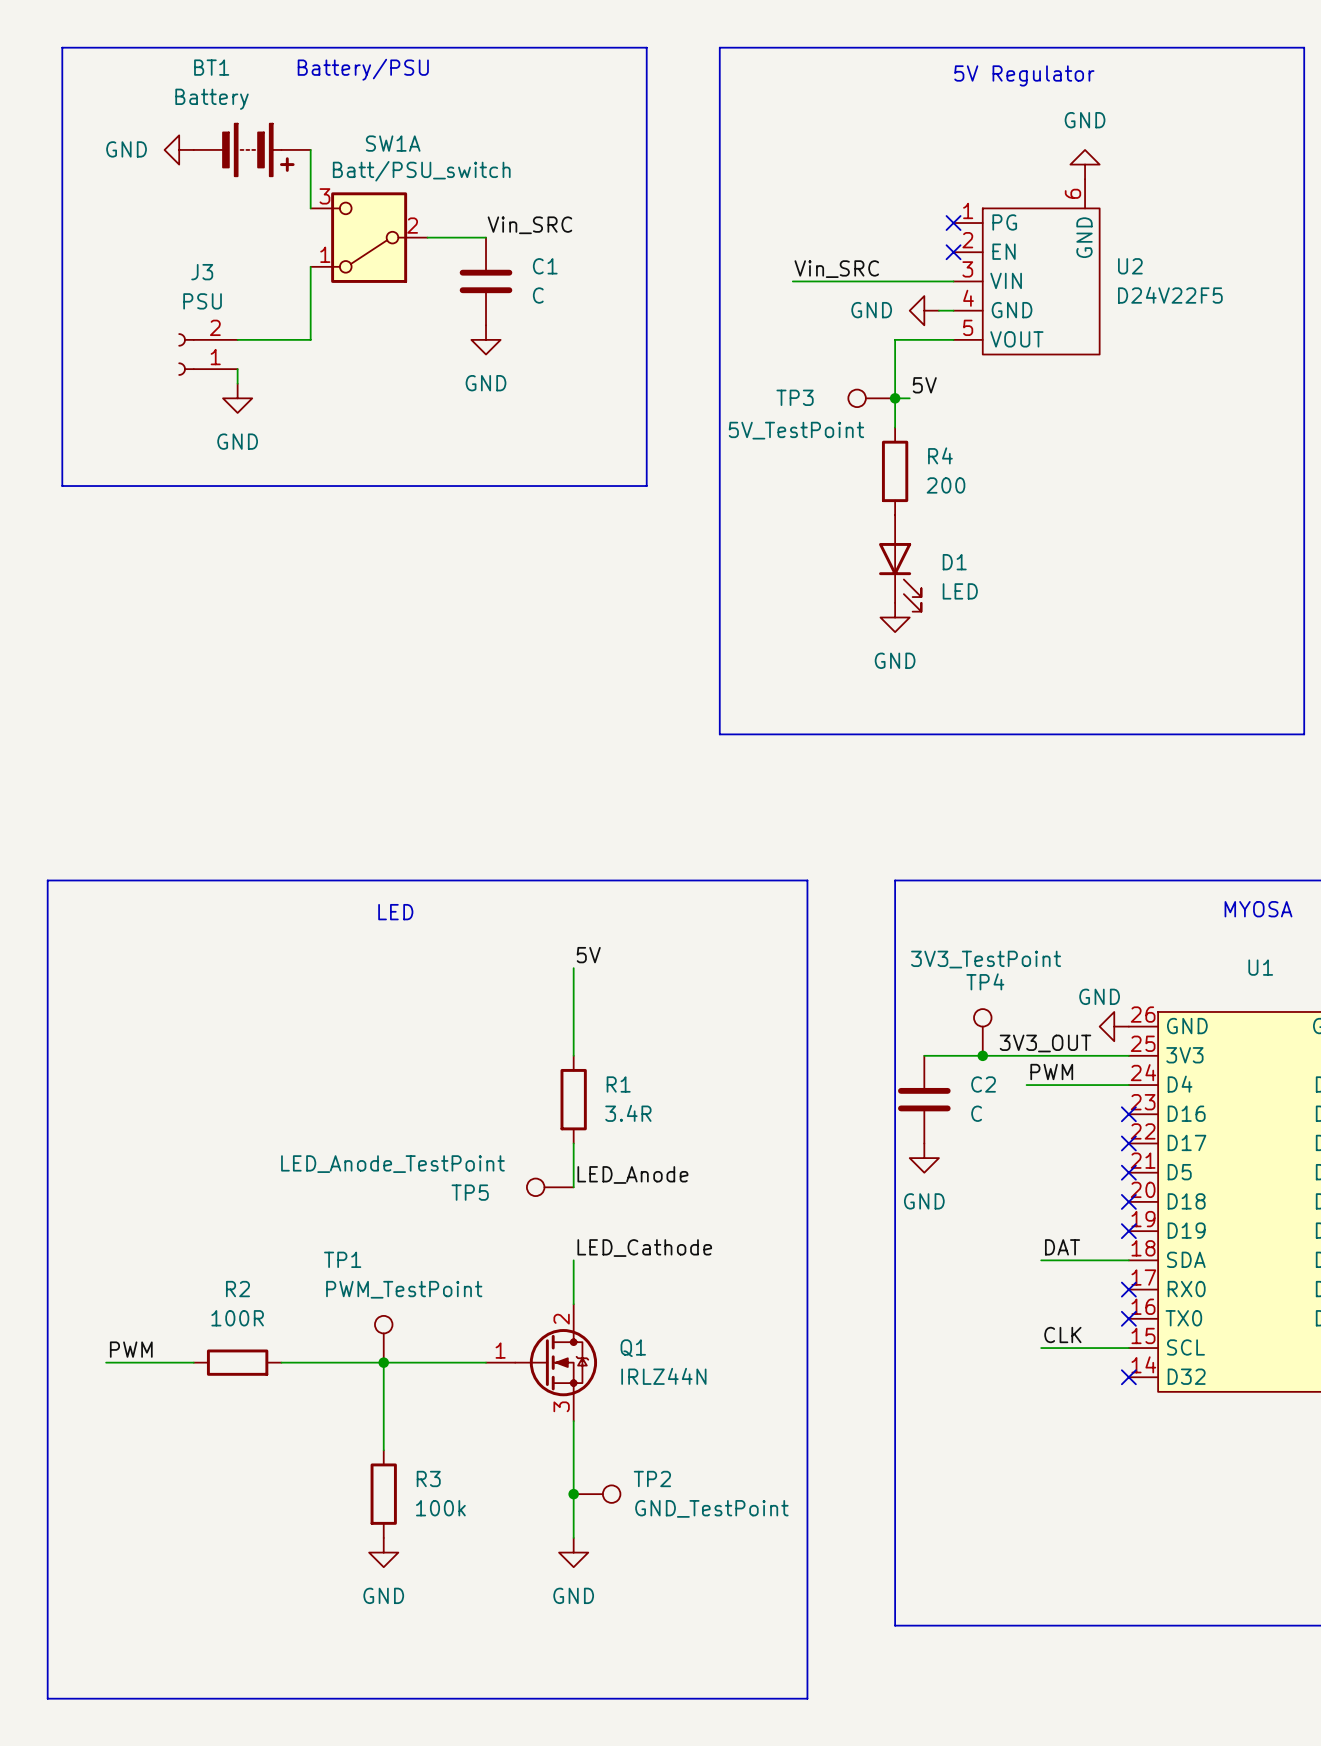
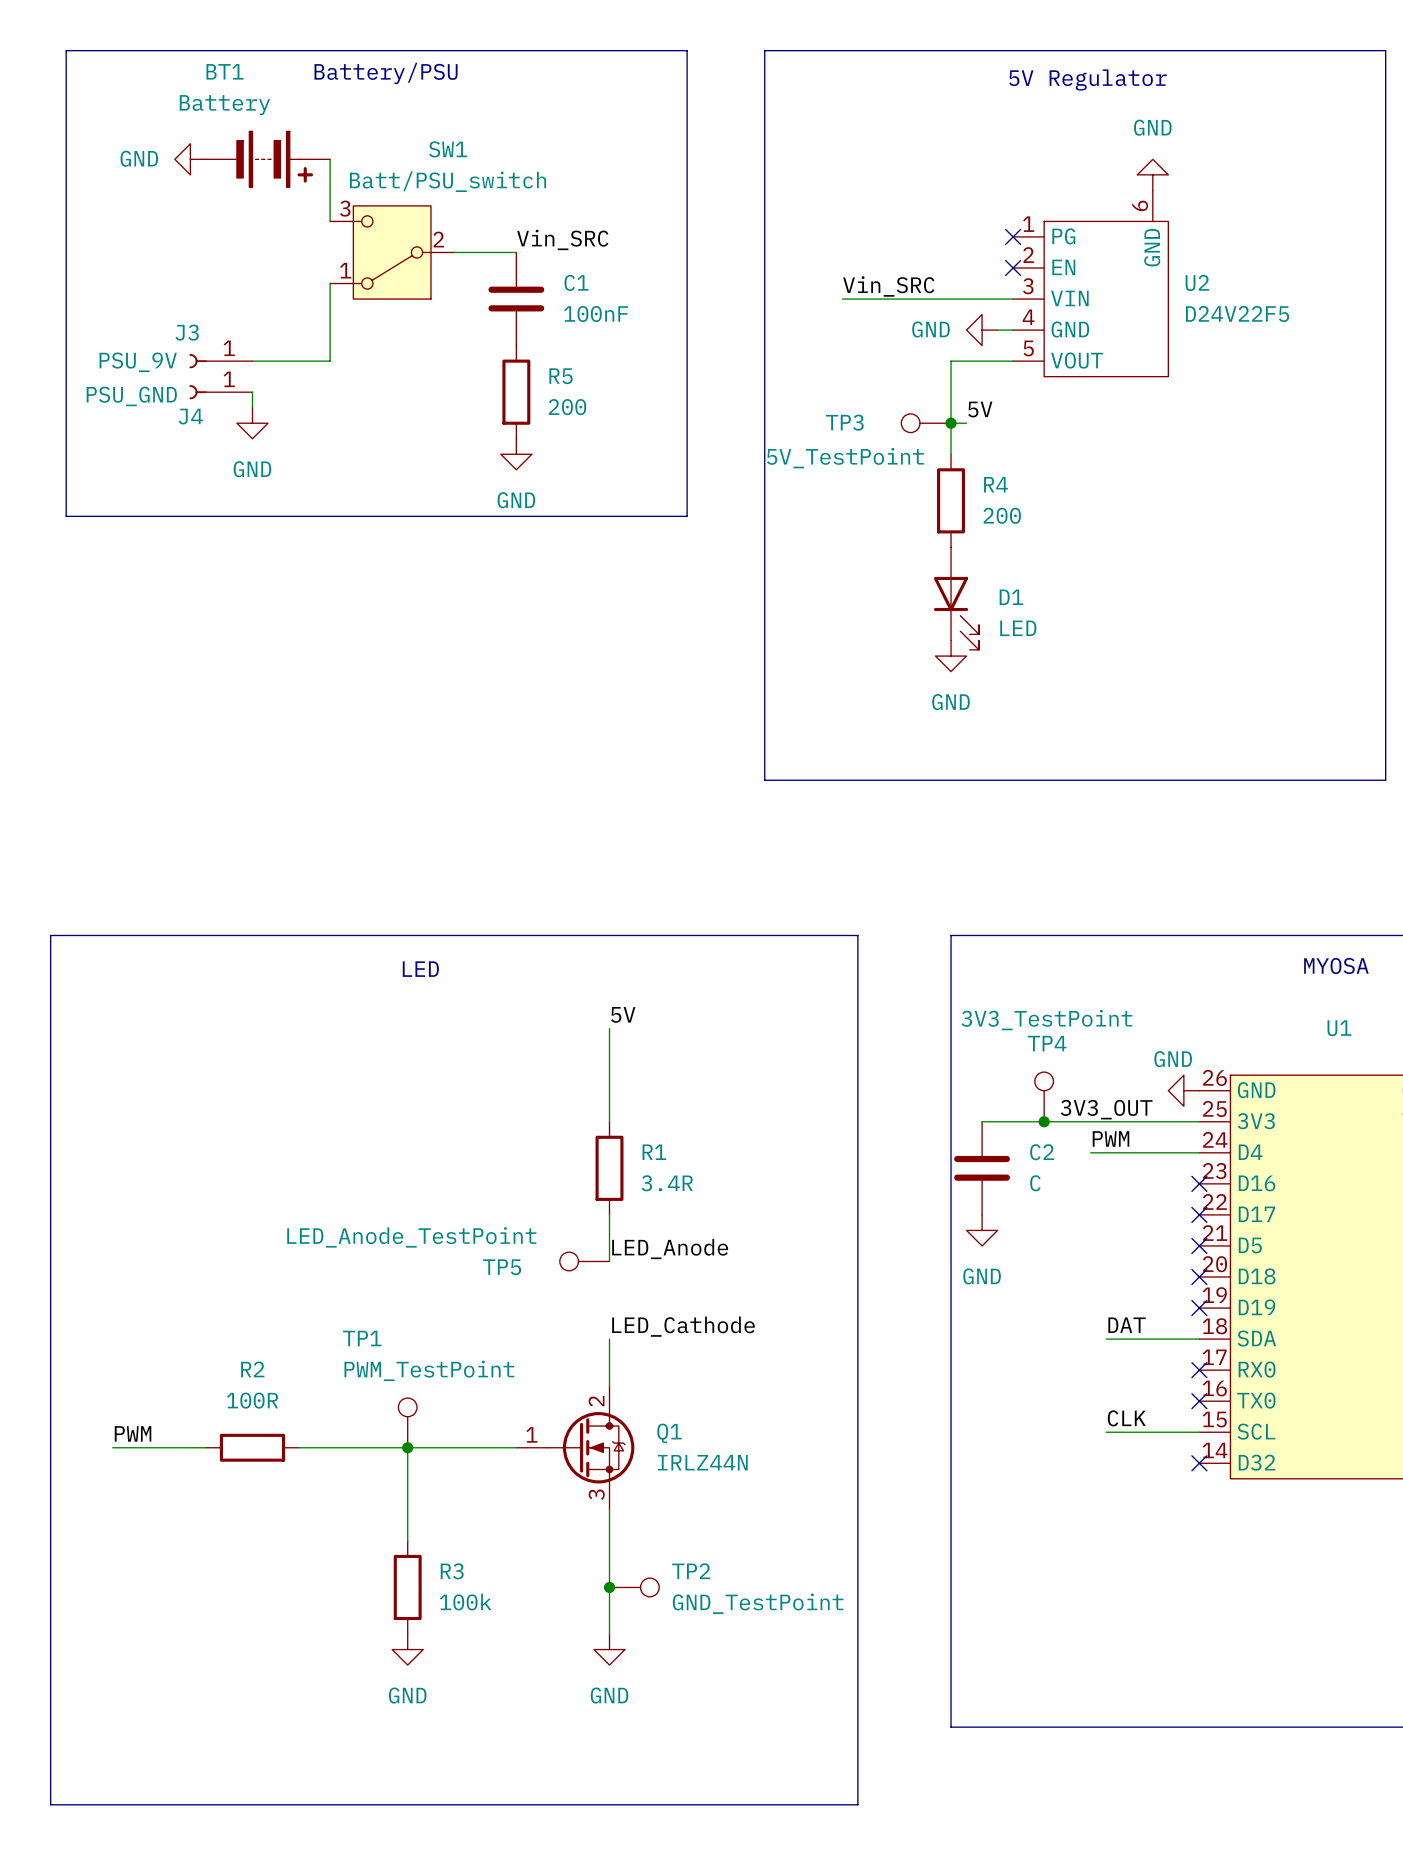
SW1A: Batt/PSU_switch (369, 237) -> none
SW1: none -> Batt/PSU_switch (392, 252)
J3 name position: J3 (202, 272) -> J3 (187, 332)
C1 value: C (538, 295) -> 100nF (596, 313)
J3 value: PSU (202, 301) -> PSU_9V (138, 362)
J3 symbol: [178, 333, 238, 376] -> [189, 353, 253, 369]
power symbol position: GND (486, 339) -> GND (516, 454)
J4: none -> PSU_GND (220, 392)
R5: none -> 200 (516, 392)

